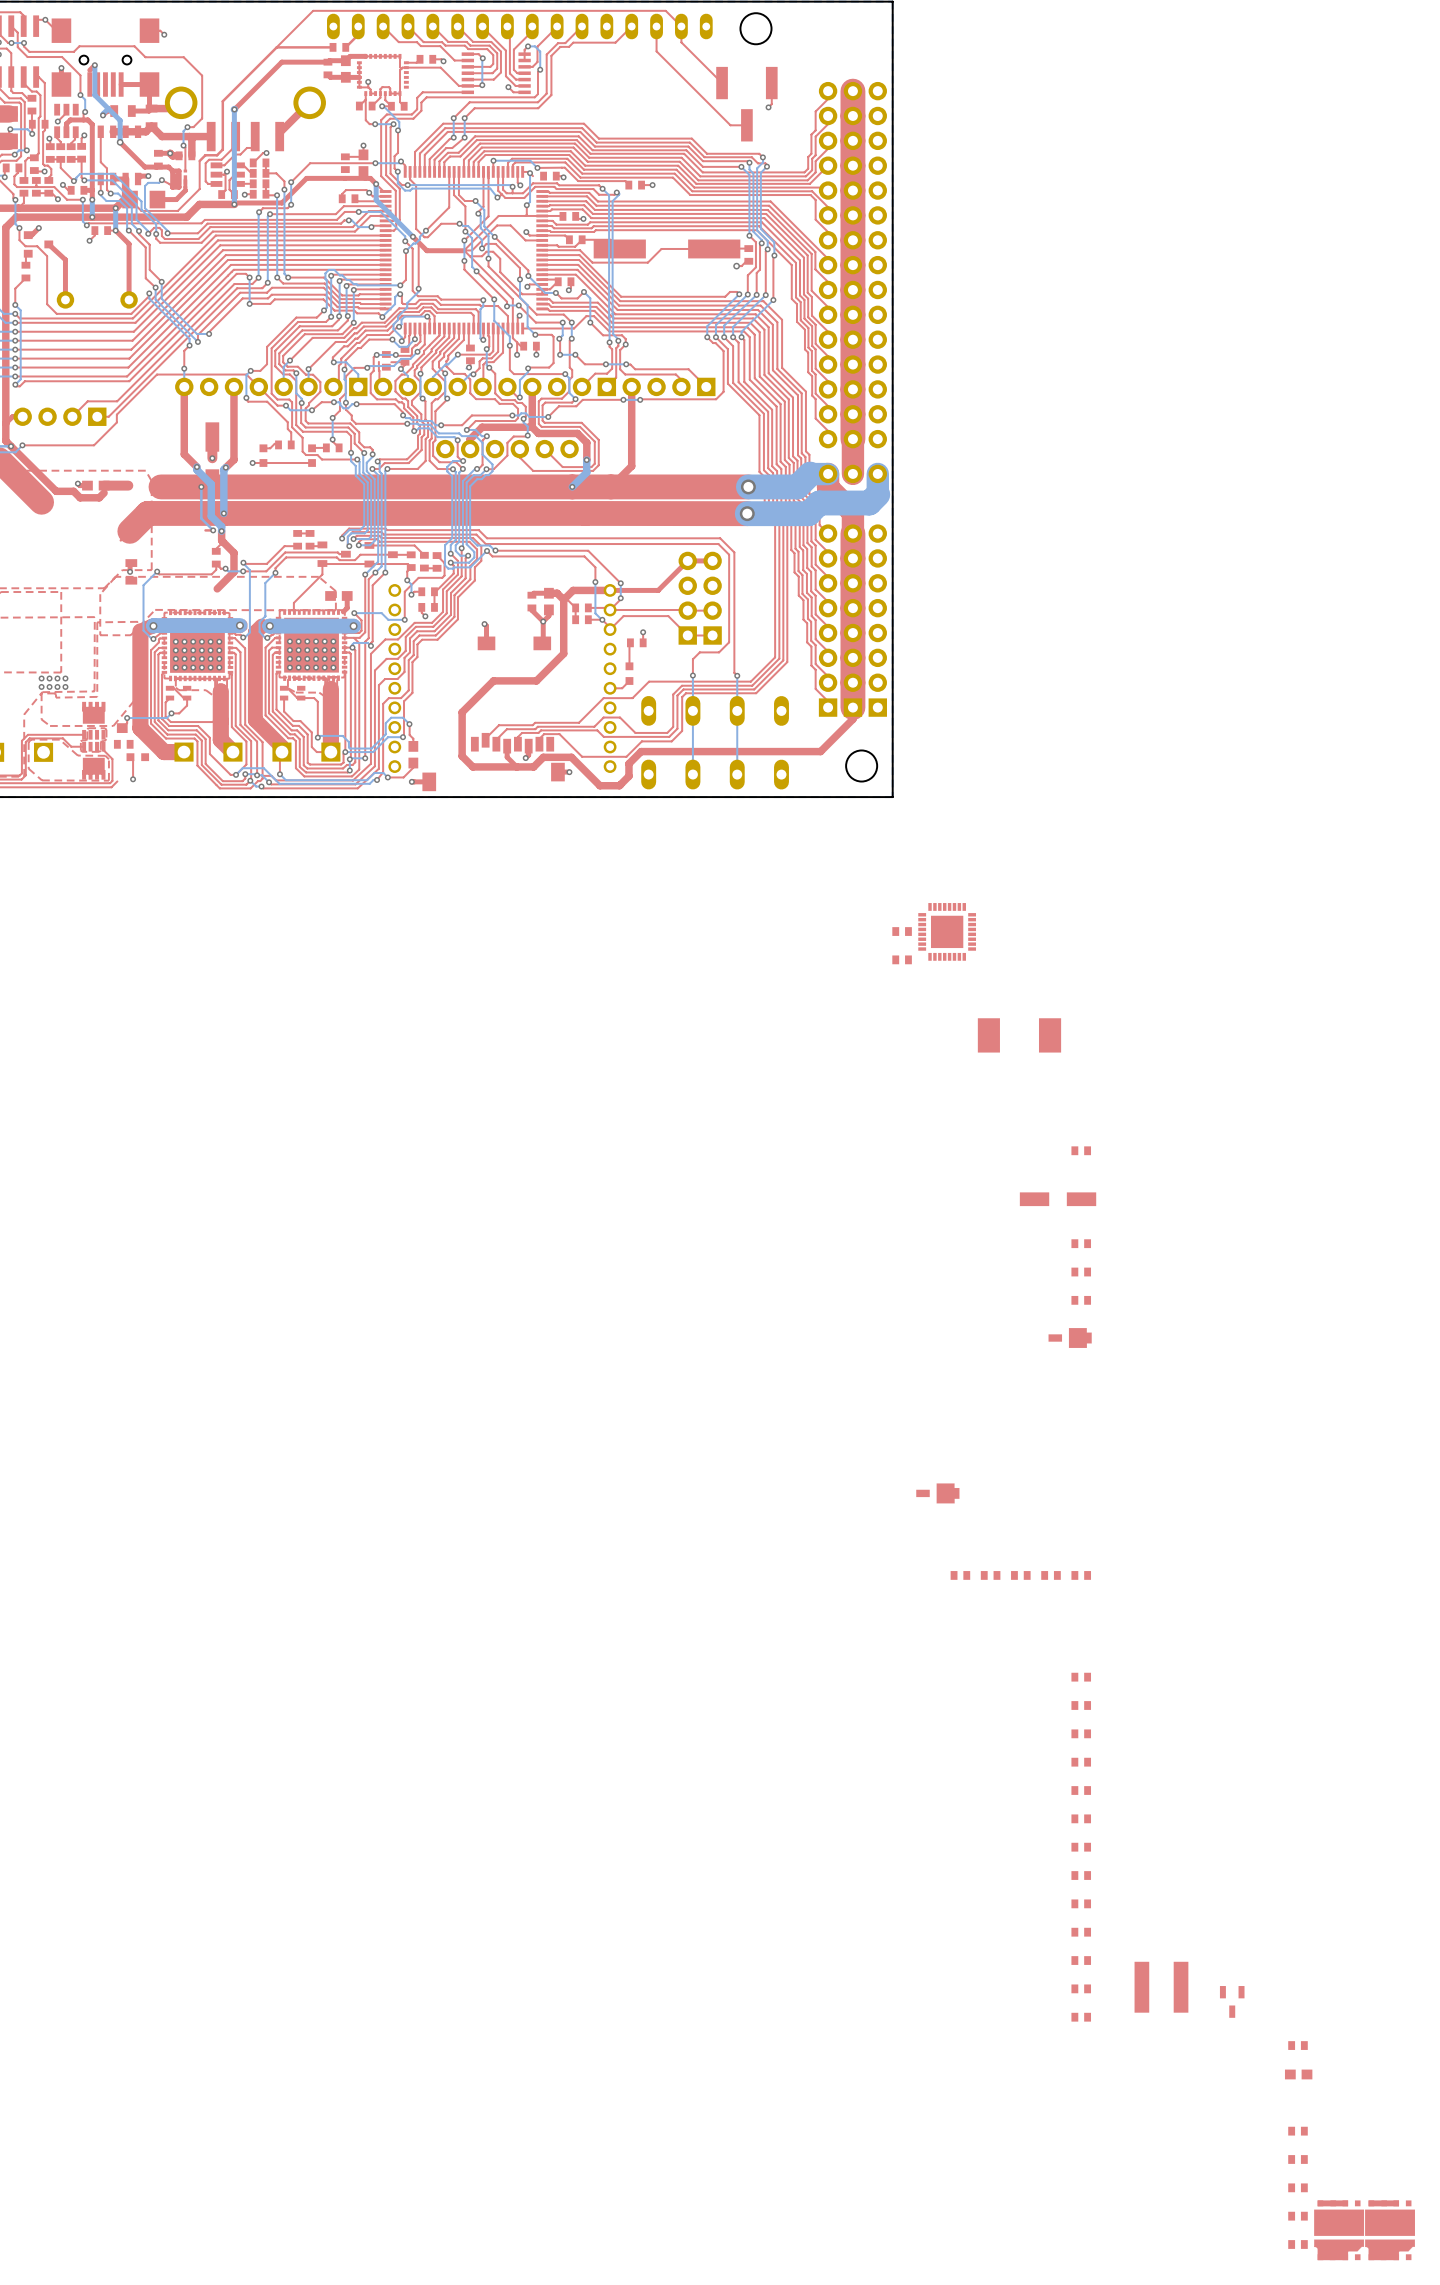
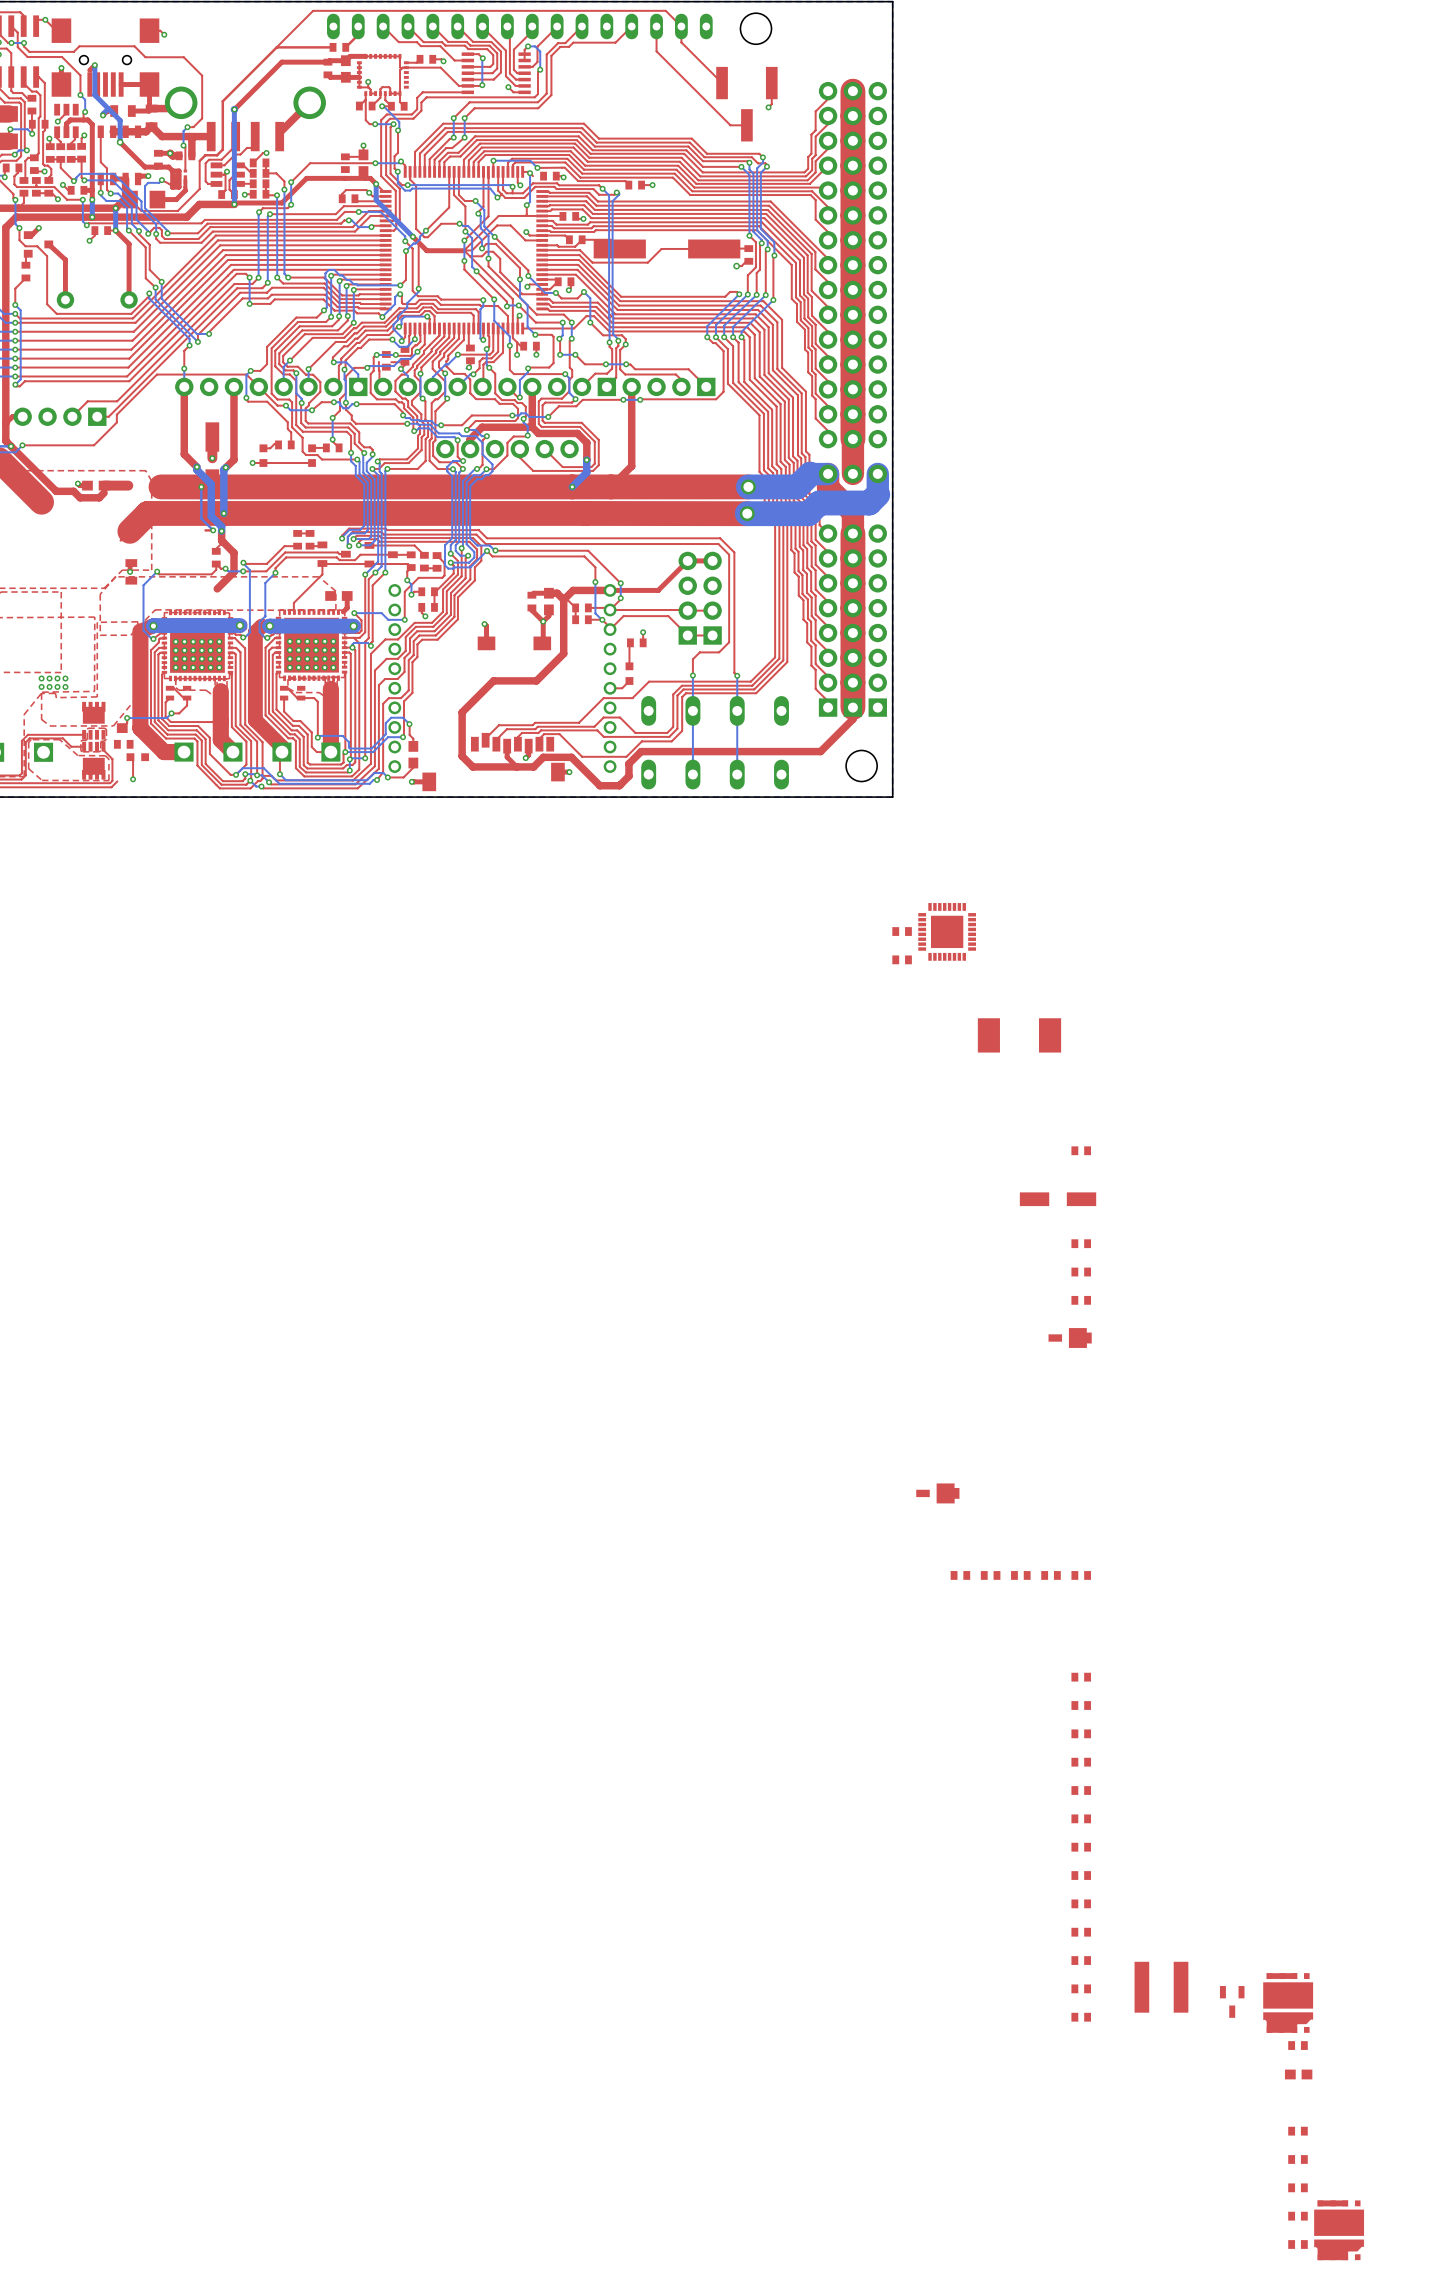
part: none -> (1288, 2002)
part: (1390, 2230) -> none

